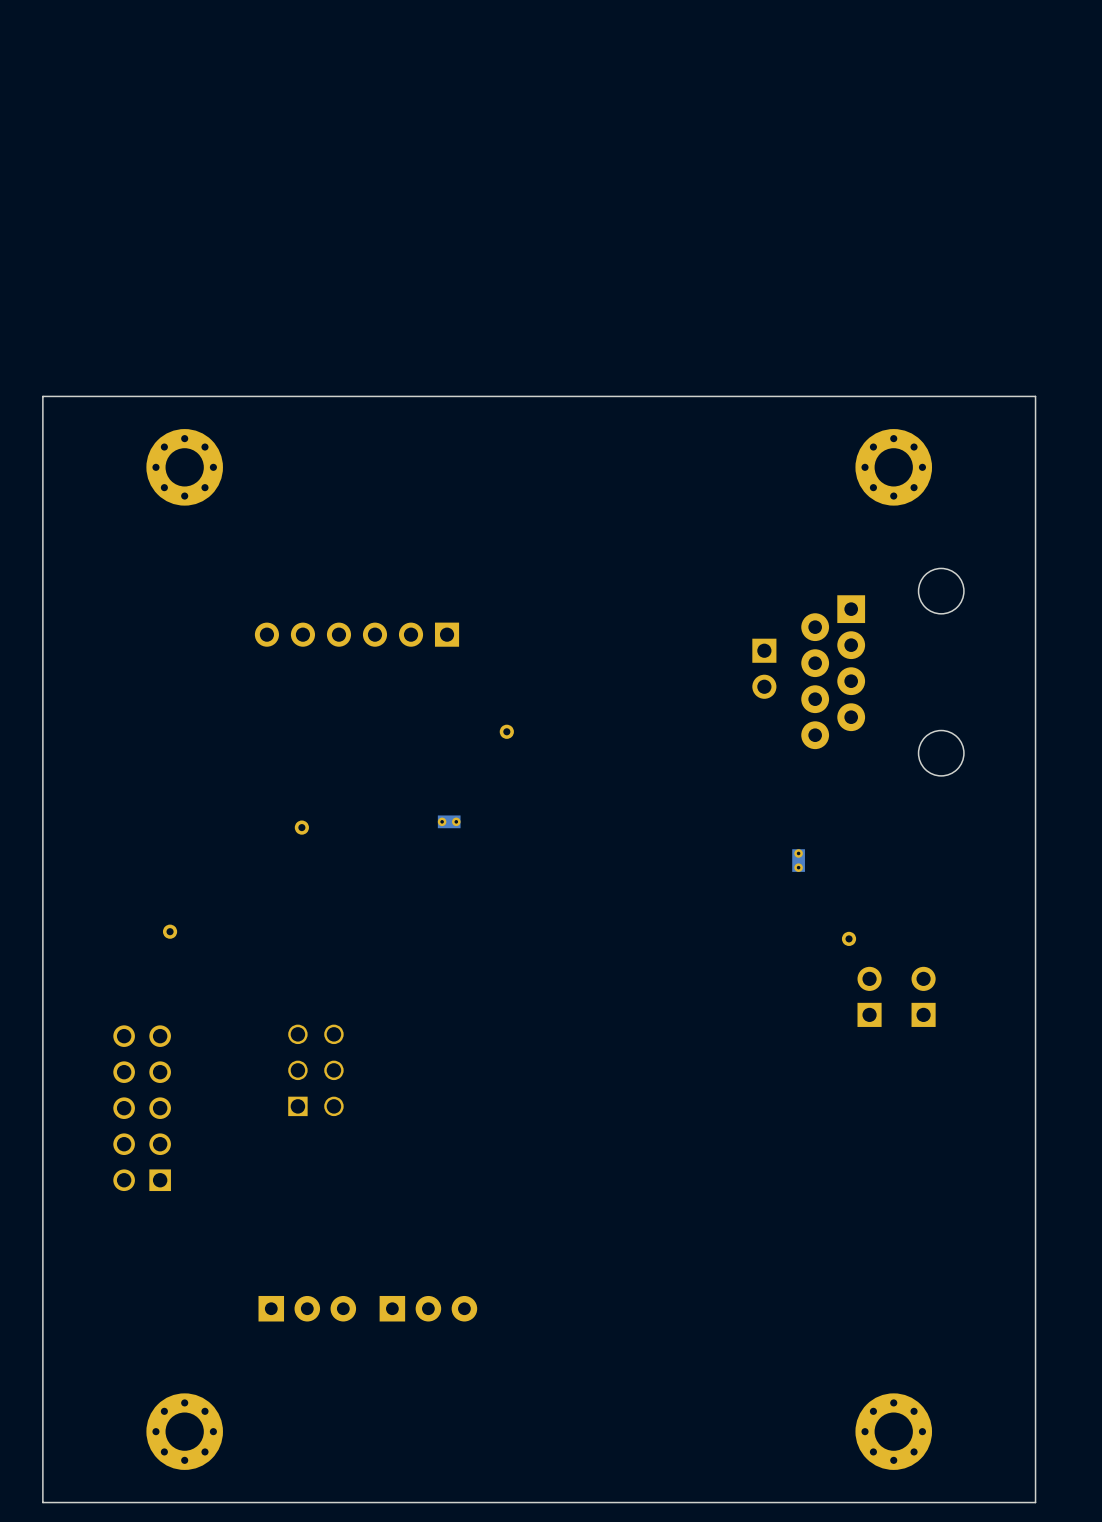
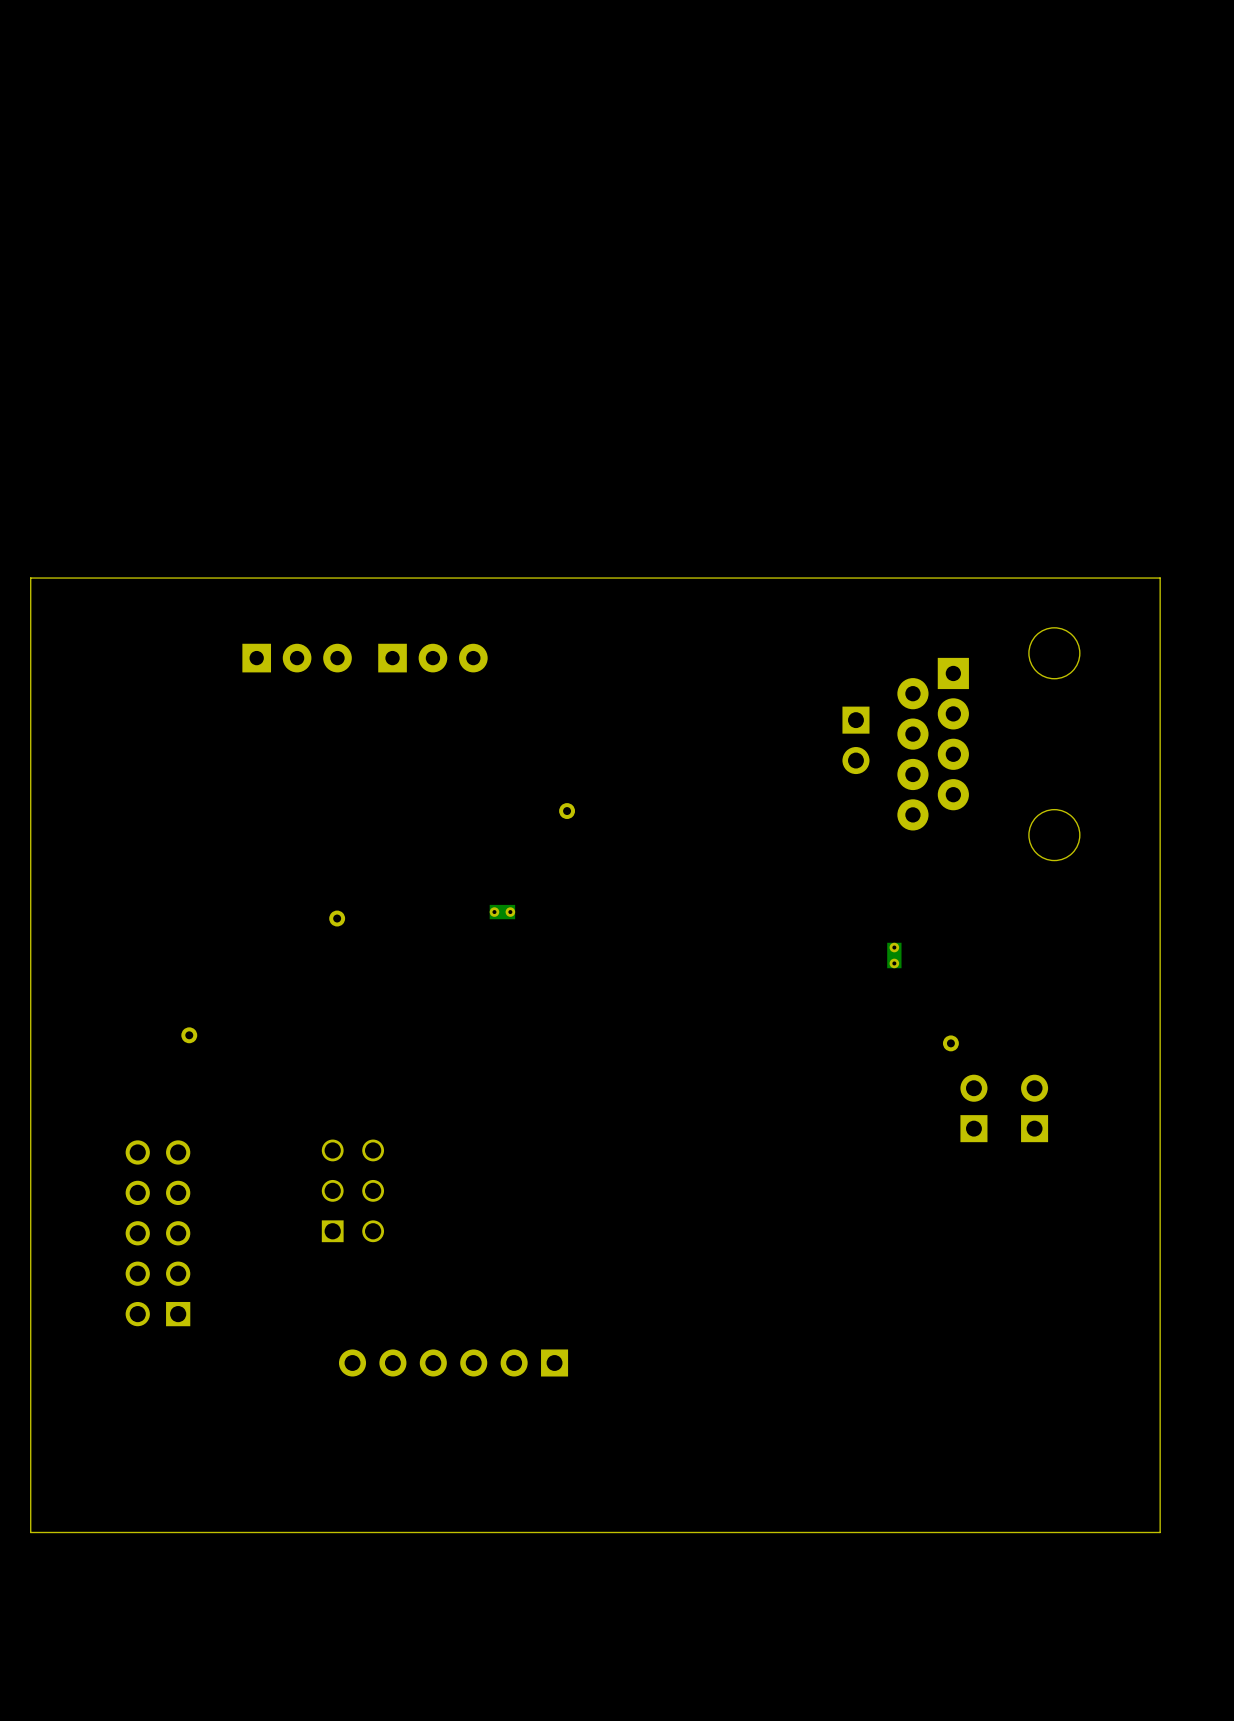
part: (184, 467) -> none
part: (893, 467) -> none
board edge: (1035, 524) (1035, 396) (42, 396) (42, 1502) (1035, 1502) (1035, 1374) -> (1160, 578) (30, 578) (30, 1532) (1160, 1532)
part: none -> (297, 658)
part: none -> (432, 658)
part: (356, 634) -> none
part: none -> (453, 1362)
part: (307, 1308) -> none
part: (428, 1308) -> none
part: (184, 1431) -> none
part: (893, 1431) -> none

